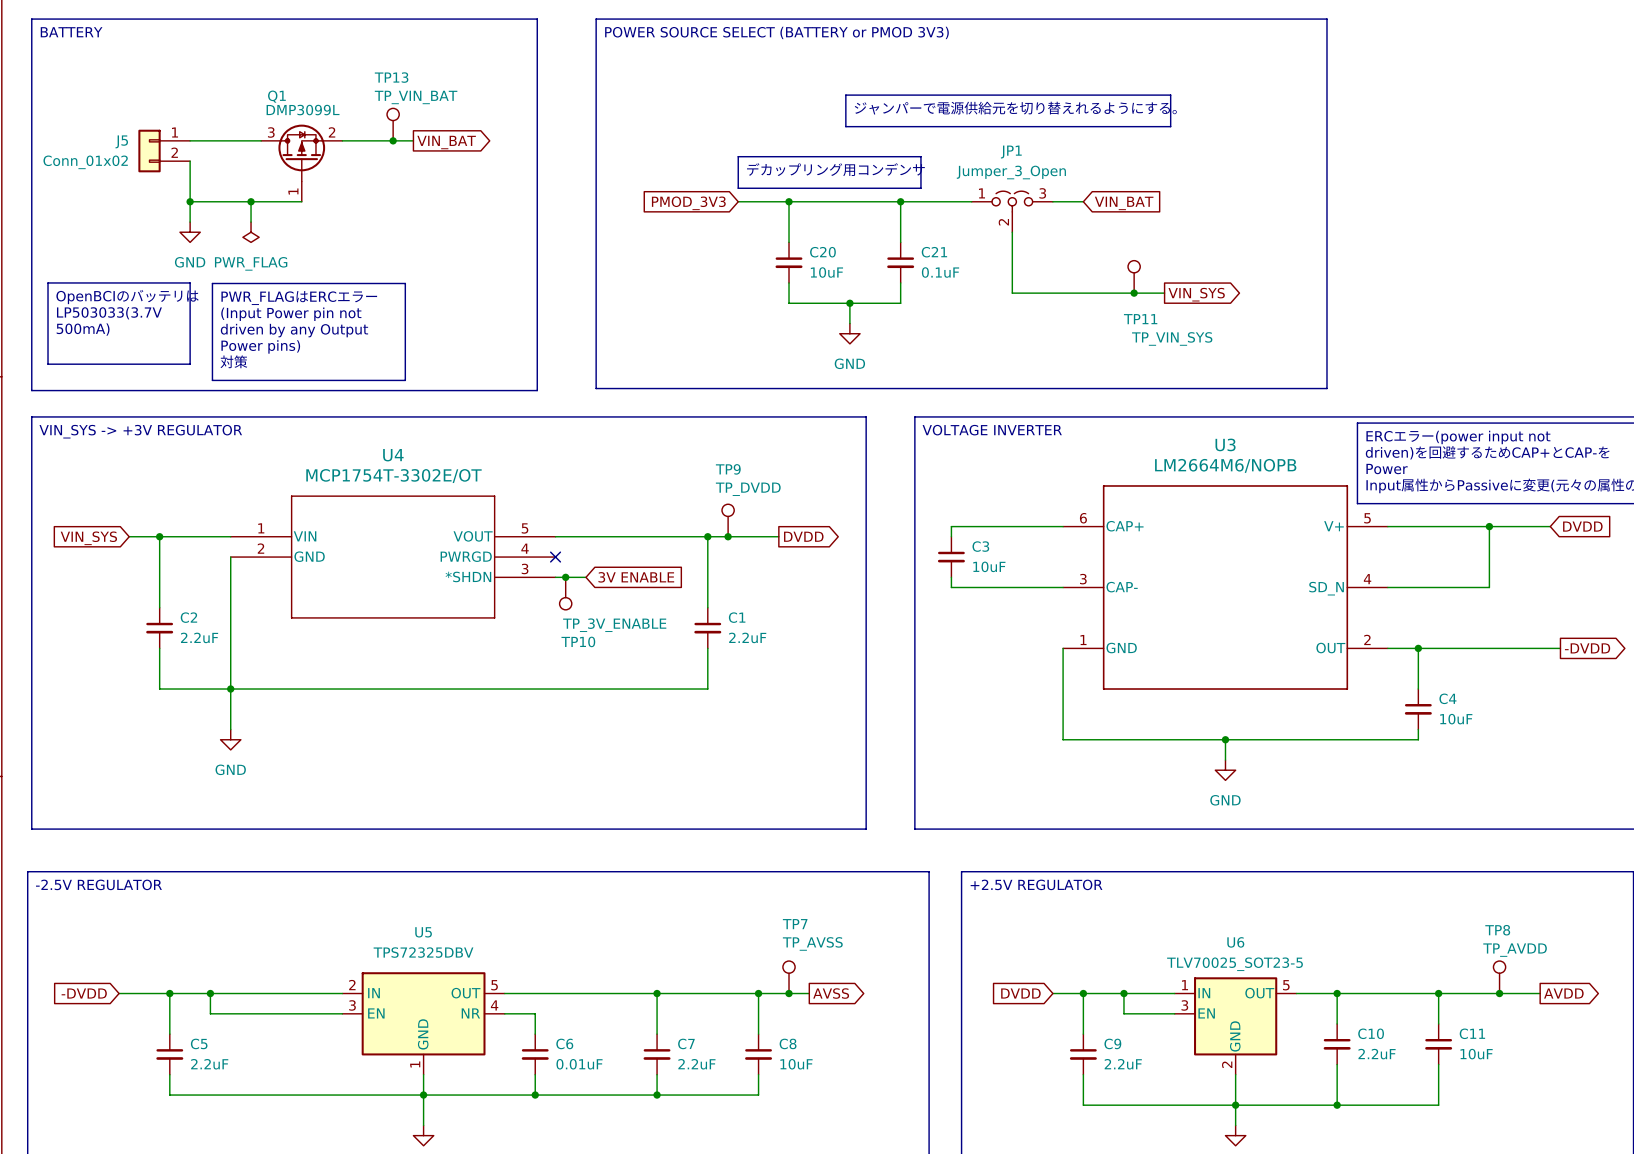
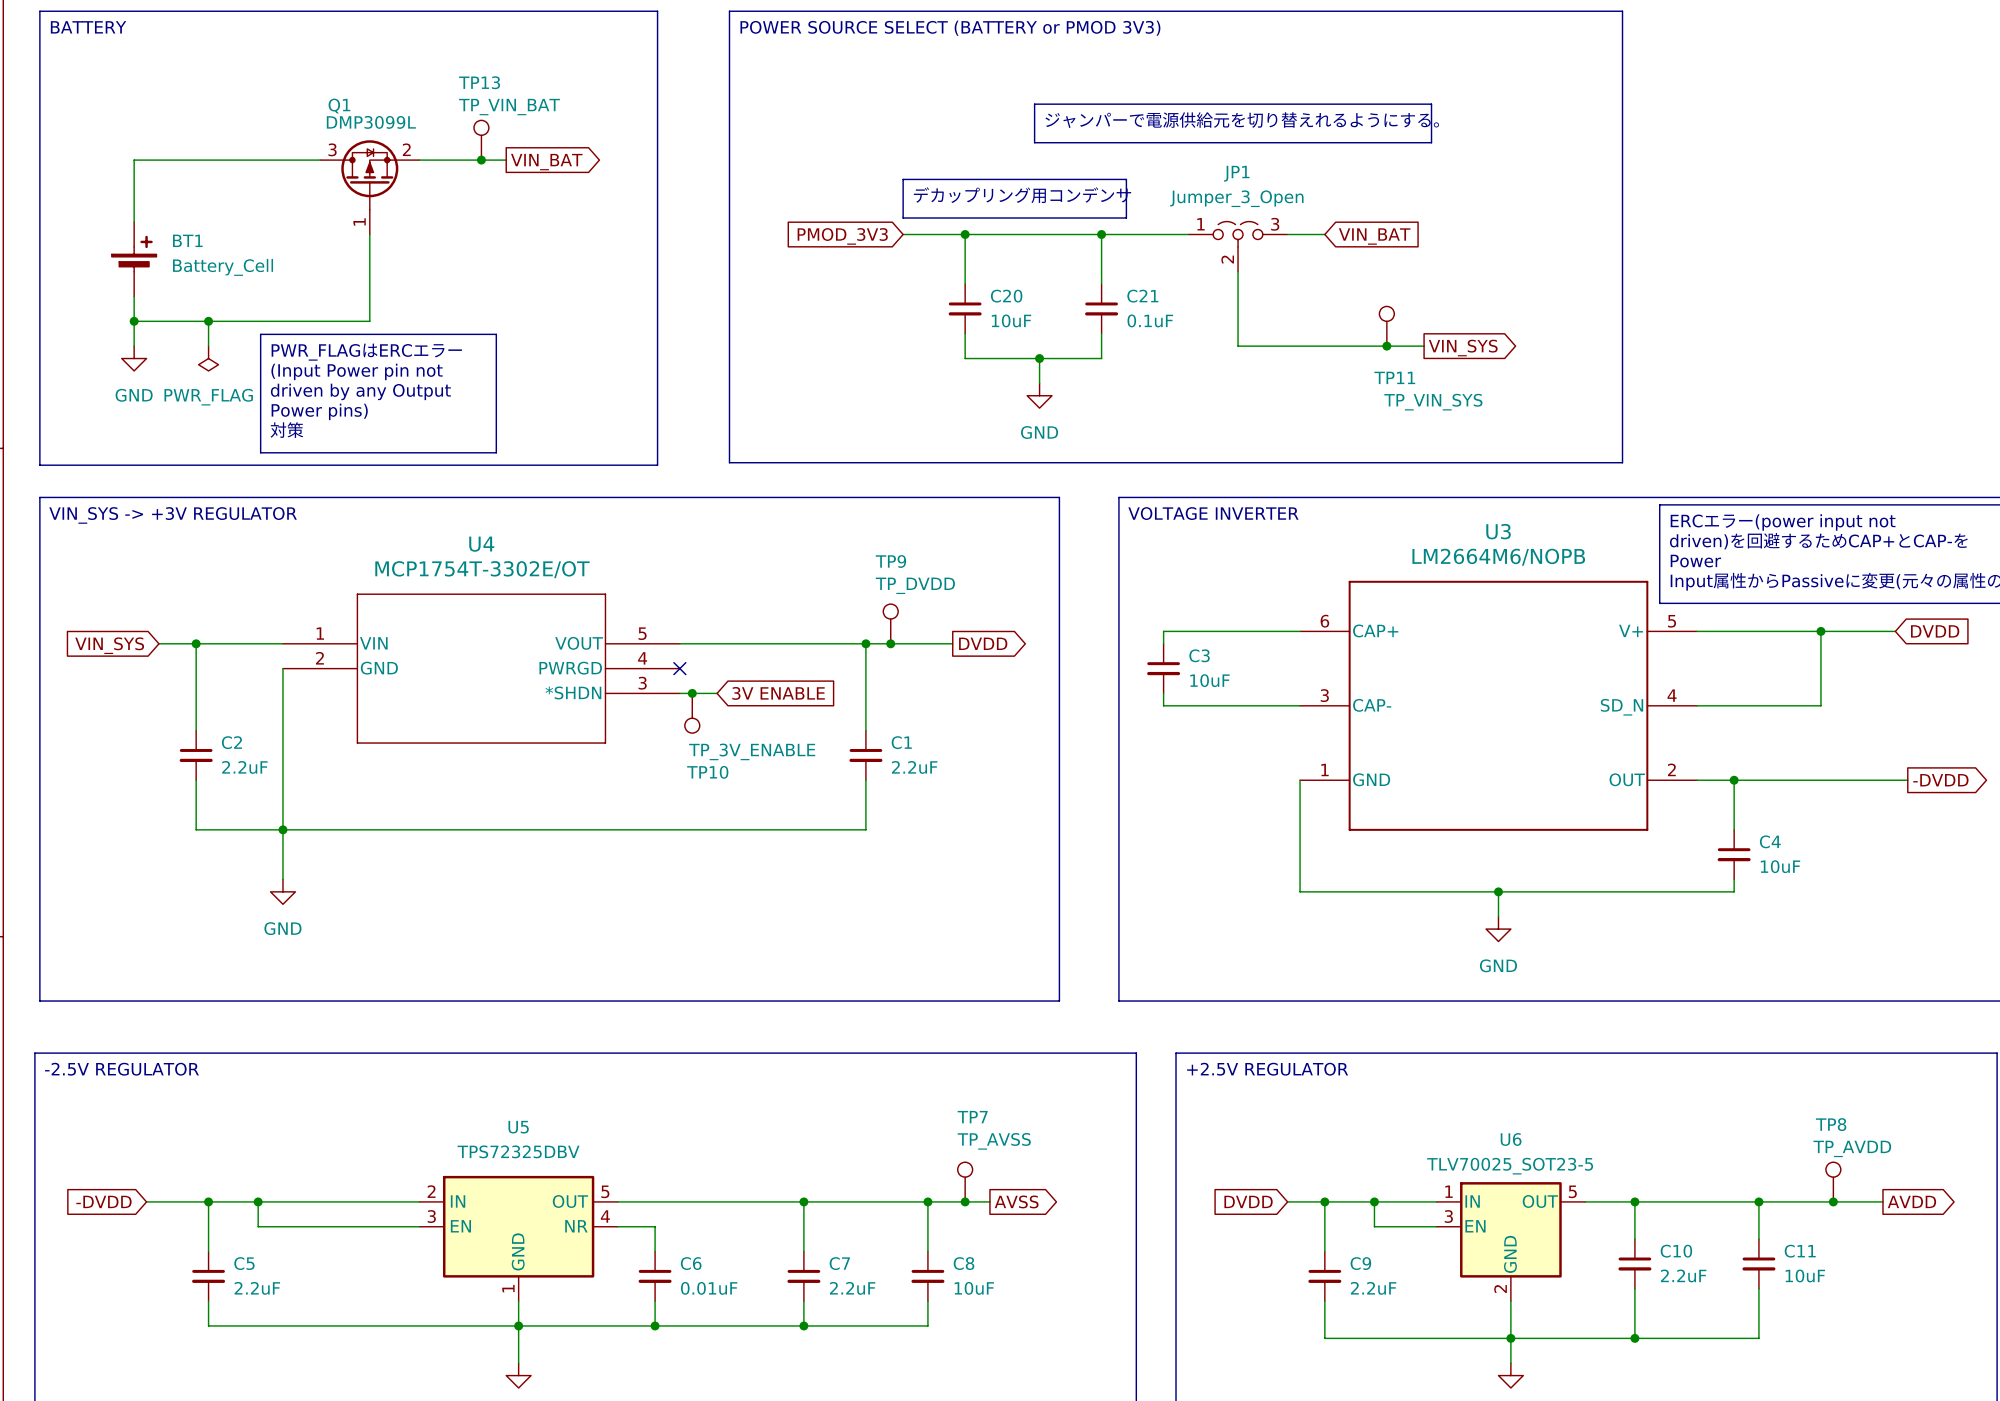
wire: none -> (233, 160) (134, 160) (134, 222)
J5: Conn_01x02 (164, 151) -> none
wire: (190, 161) (190, 222) -> none
wire: (190, 201) (301, 201) -> (134, 321) (369, 321) (369, 234)
junction: (190, 201) -> none
wire: (251, 201) (251, 222) -> (208, 321) (208, 346)
junction: (251, 201) -> none
BT1: none -> Battery_Cell (134, 259)
power symbol position: GND (190, 232) -> GND (134, 358)
power symbol position: PWR_FLAG (251, 232) -> PWR_FLAG (208, 358)
wire: none -> (134, 296) (134, 346)
junction: none -> (134, 321)
junction: none -> (208, 321)
line: (48, 282) (190, 282) (190, 364) (48, 364) (48, 282) -> none
text: OpenBCIのバッテリは (127, 297) -> none
text: LP503033(3.7V (109, 313) -> none
text: 500mA) (83, 329) -> none

